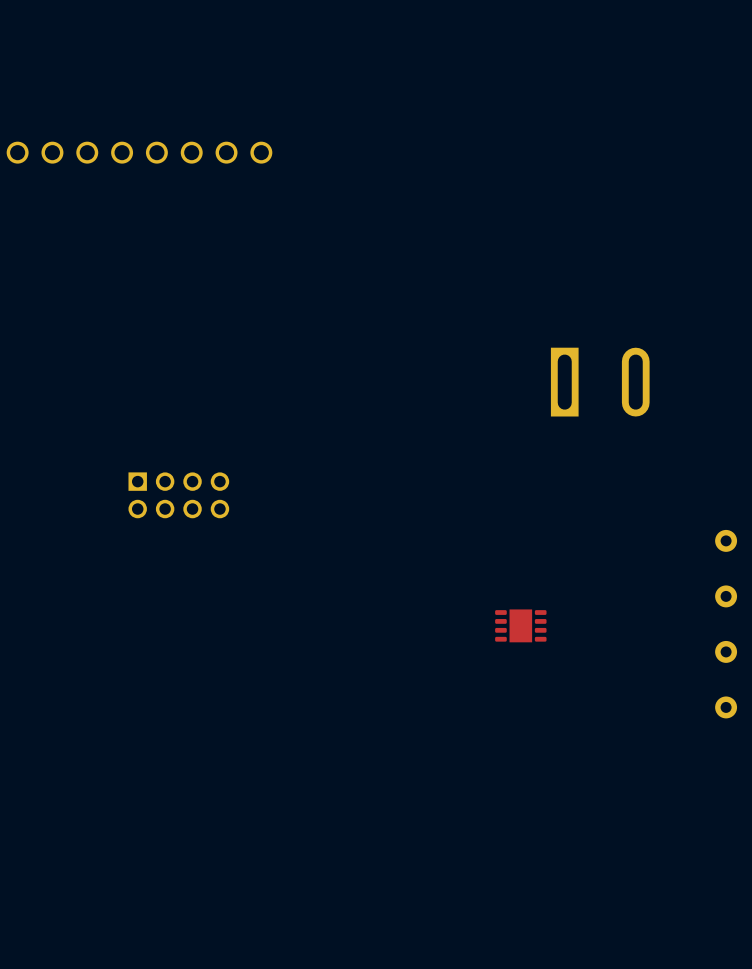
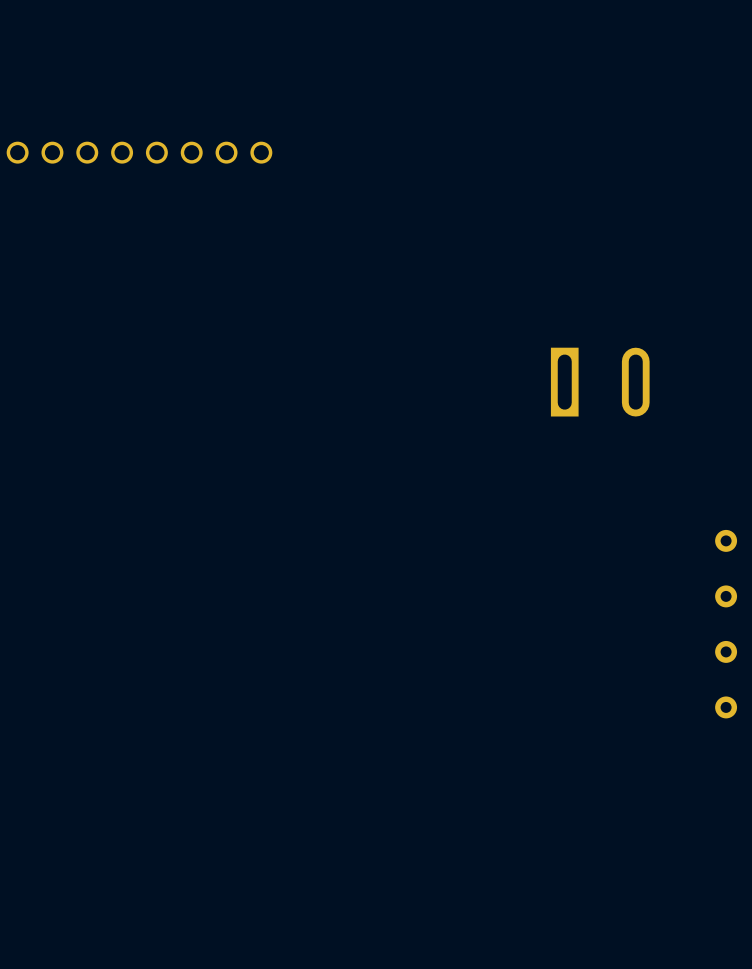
part: (178, 495) -> none
part: (520, 625) -> none

